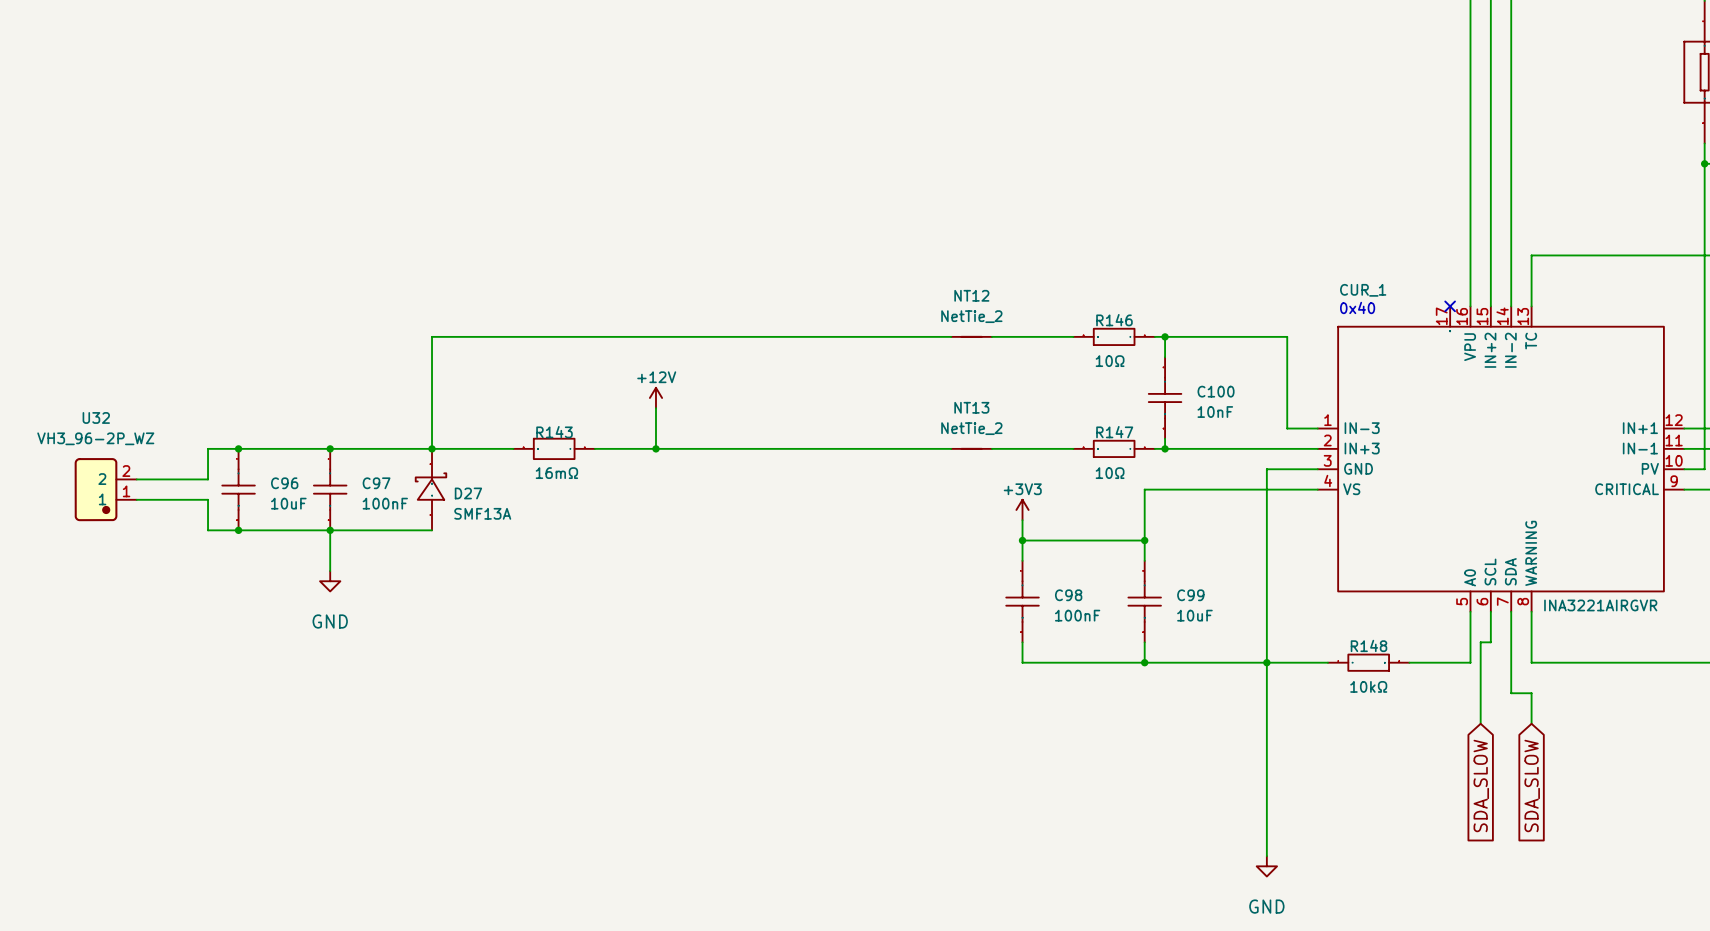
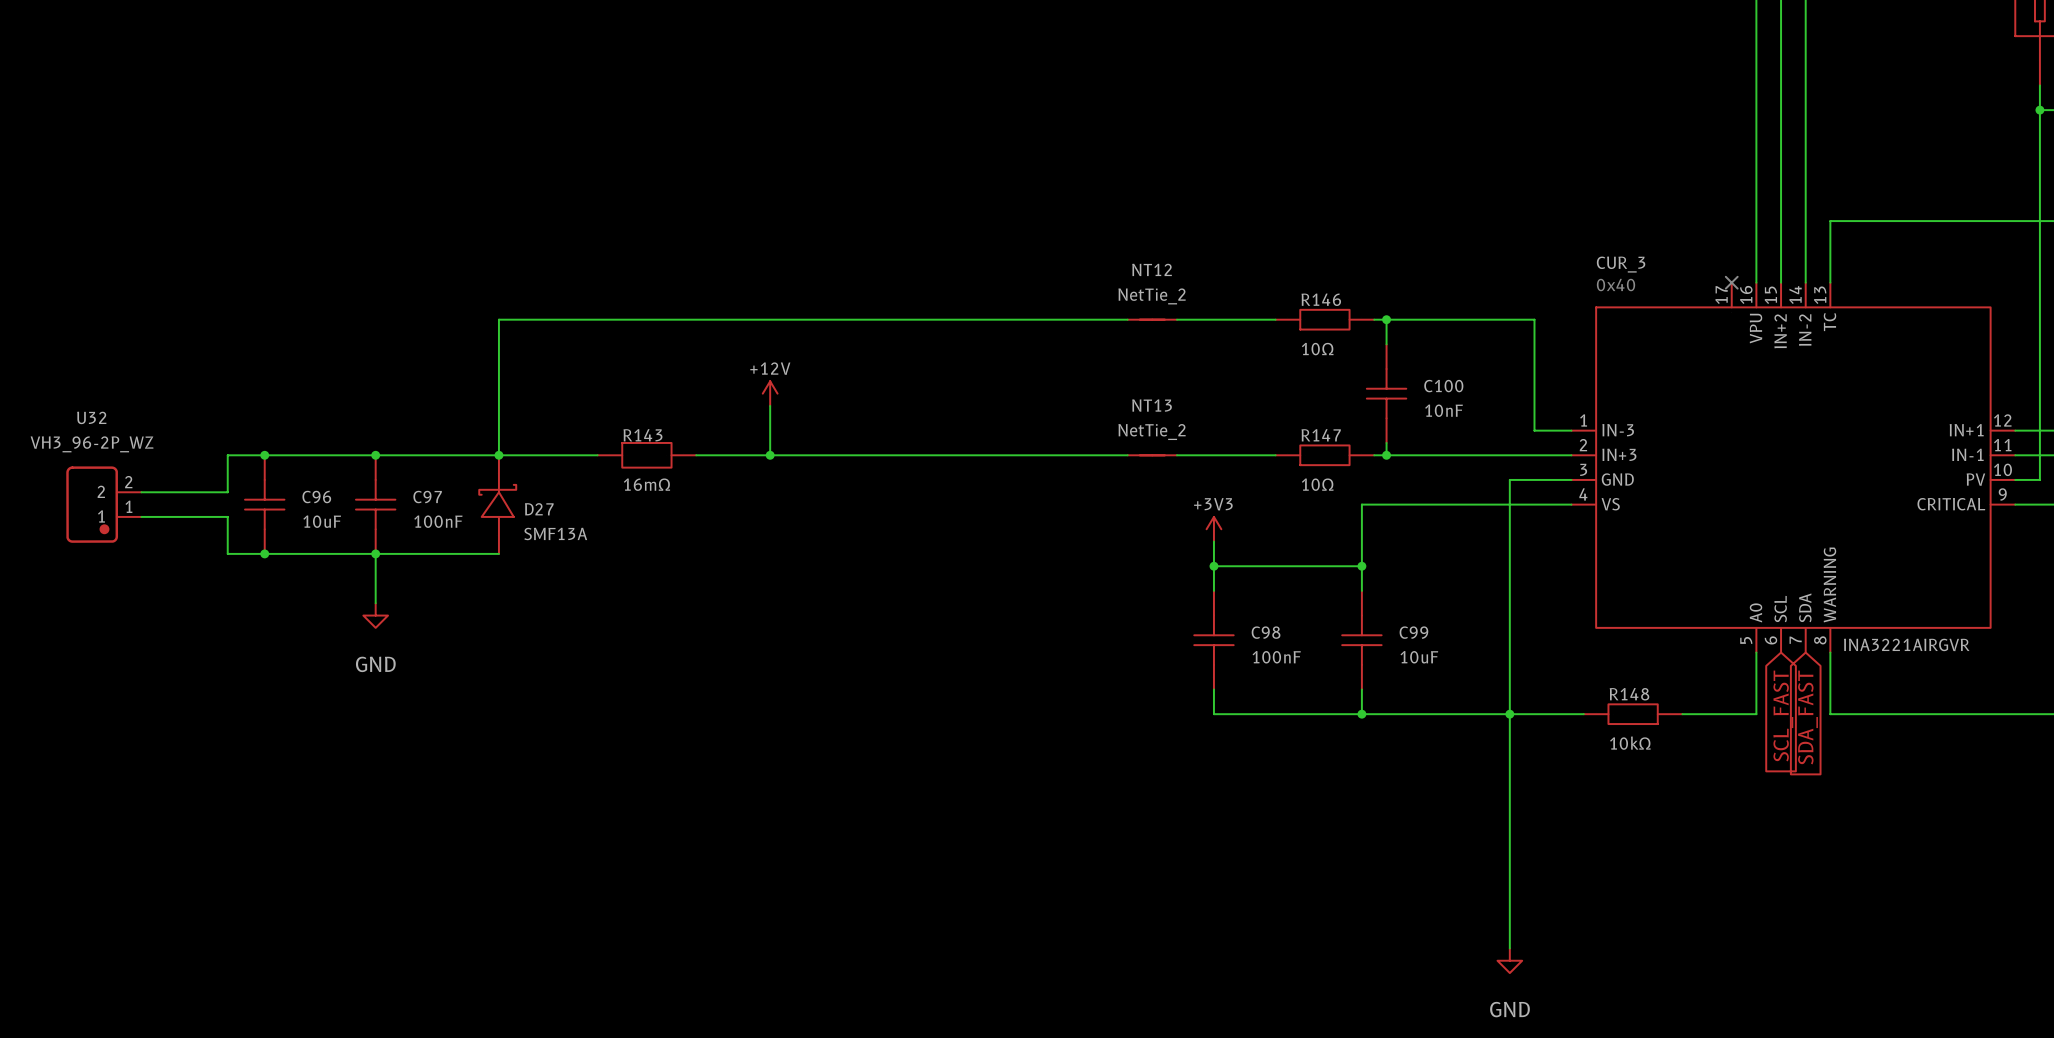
CUR_1 name: CUR_1 (1363, 290) -> CUR_3 (1621, 264)
wire: (1490, 611) (1490, 642) (1480, 642) (1480, 723) -> none
wire: (1511, 611) (1511, 693) (1531, 693) (1531, 723) -> none
global label: none -> SCL_FAST (1783, 716)
global label: SDA_SLOW (1481, 785) -> none
global label: SDA_SLOW (1532, 785) -> SDA_FAST (1807, 717)

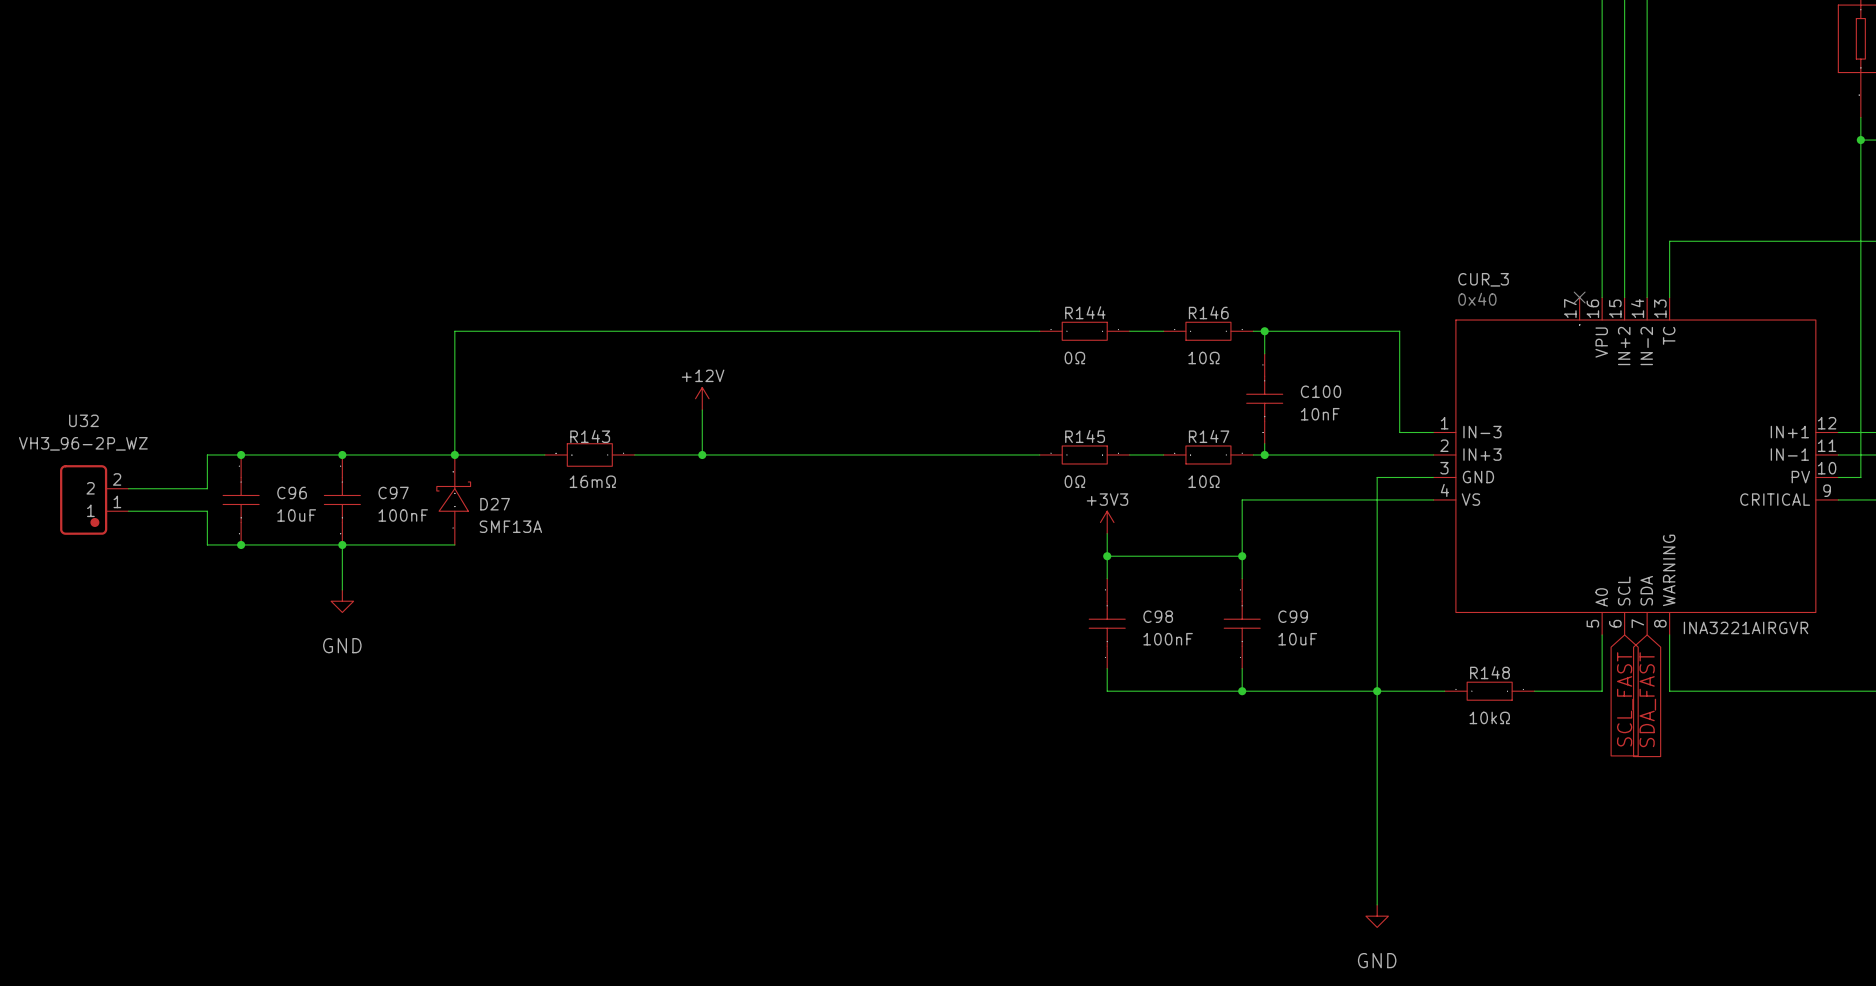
NT12: NetTie_2 (1152, 319) -> none
wire: (1176, 319) (1238, 319) -> none
R144: none -> 0Ω (1084, 331)
NT13: NetTie_2 (1152, 455) -> none
wire: (1176, 455) (1238, 455) -> none
R145: none -> 0Ω (1084, 454)

